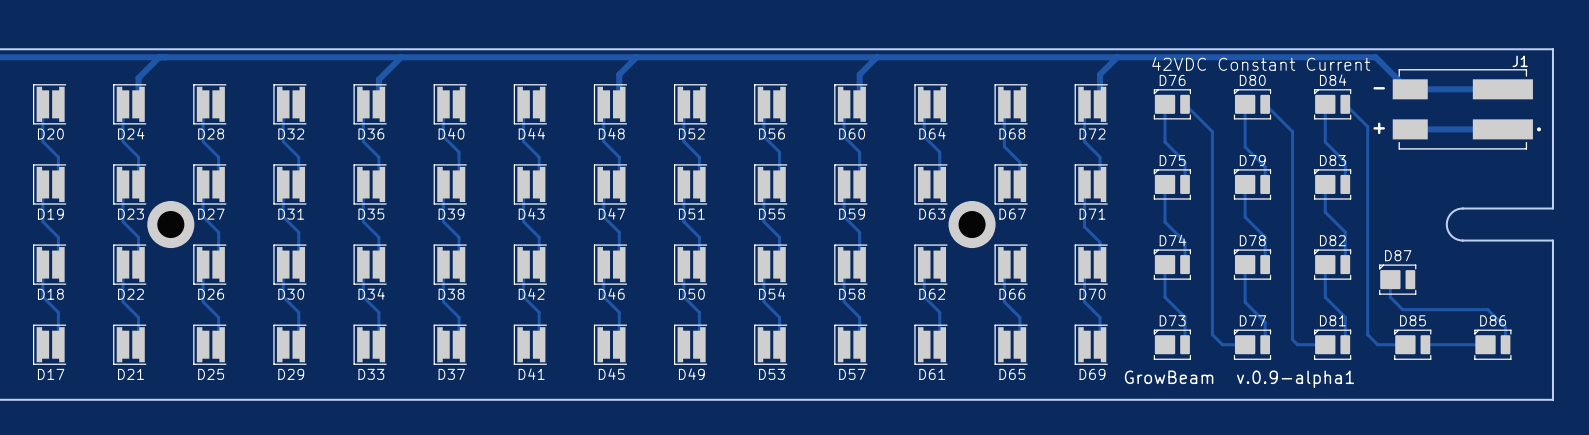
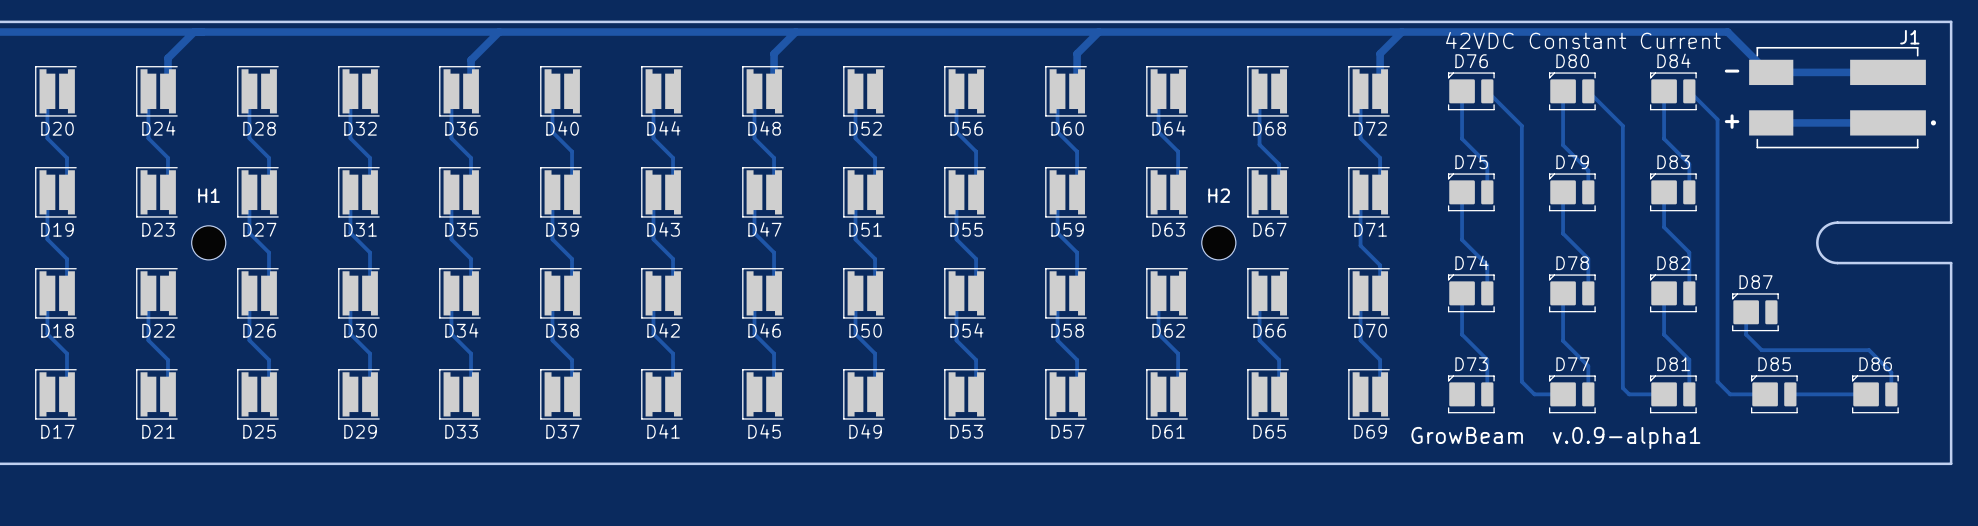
track: (123, 184) (123, 221) (138, 237) (138, 264) -> none
part: (170, 224) -> none
H1: none -> (208, 242)
part: (972, 224) -> none
H2: none -> (1218, 242)

